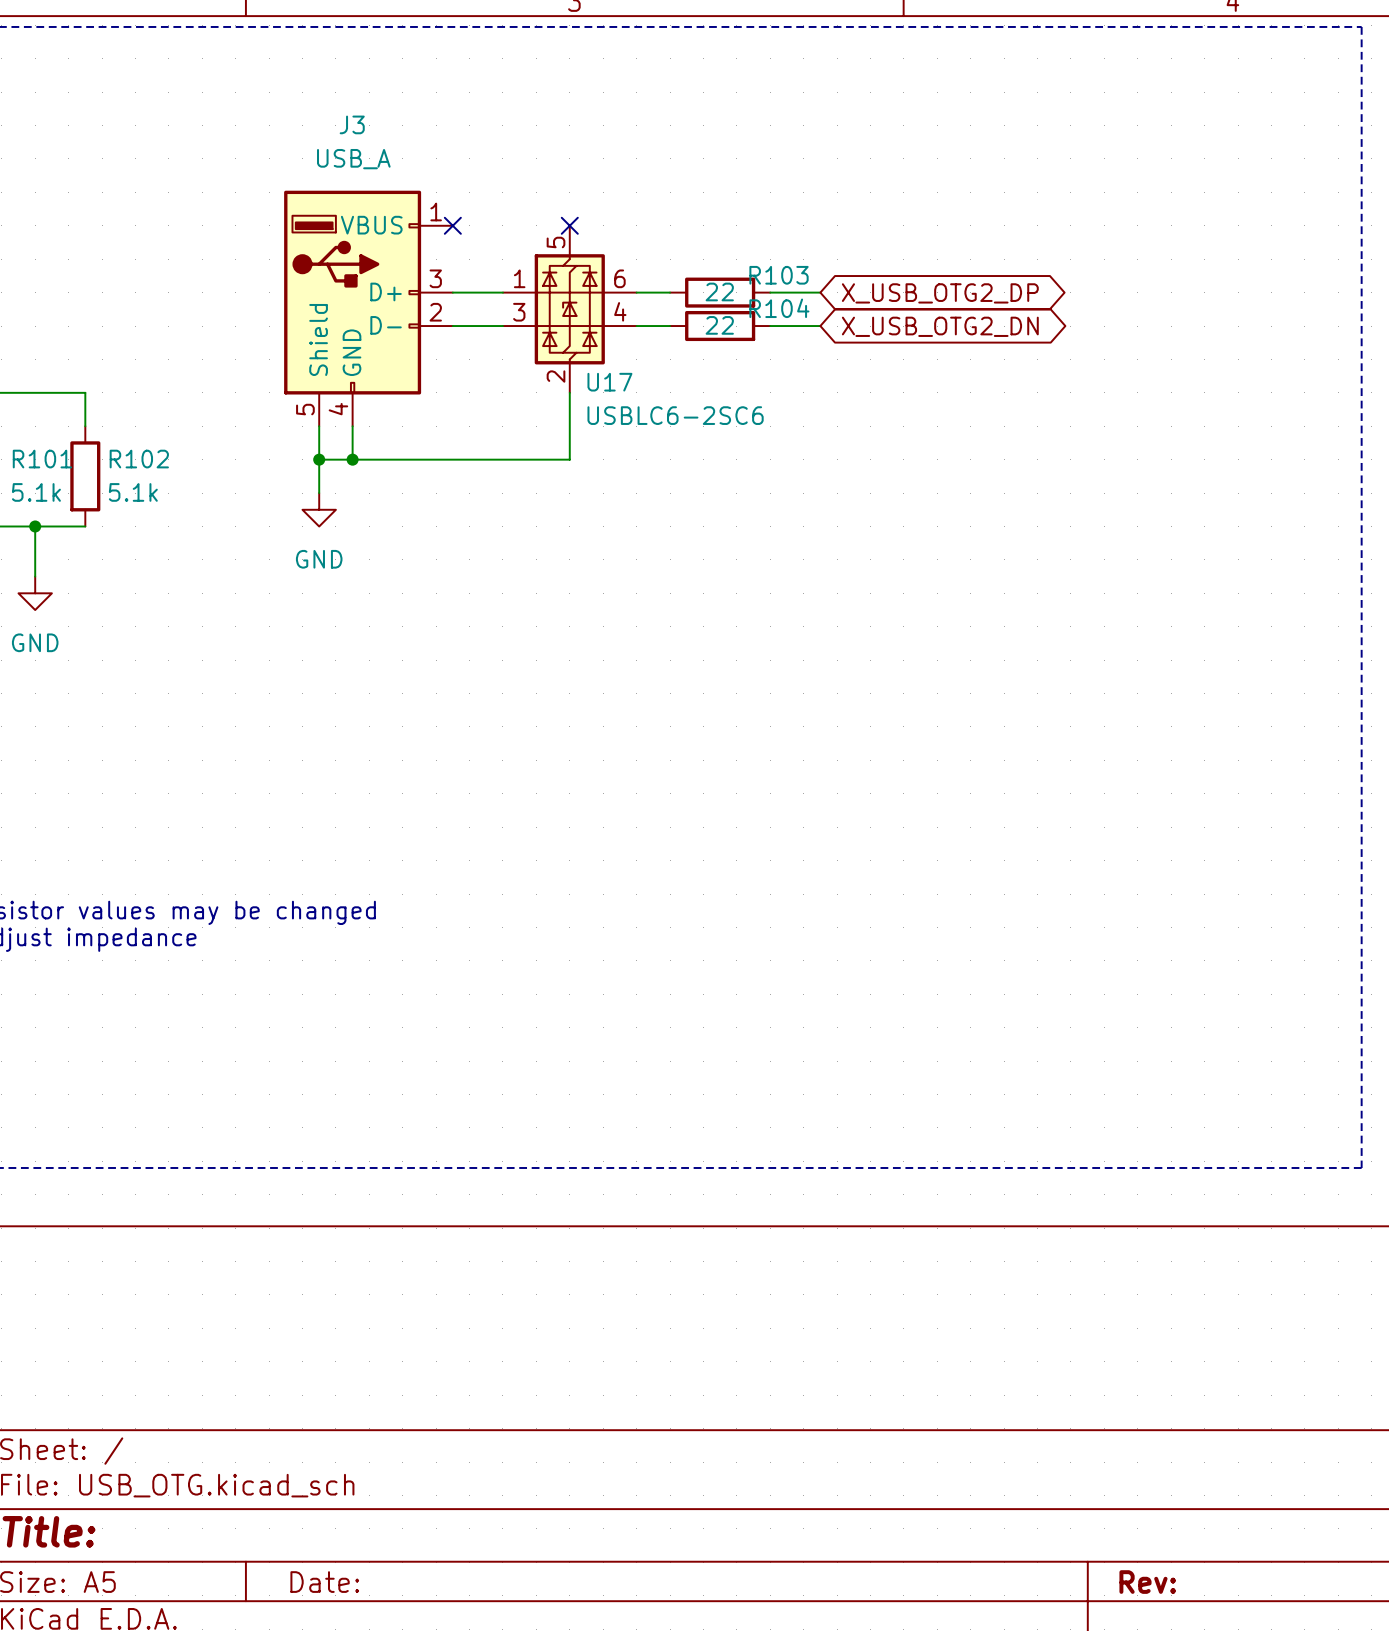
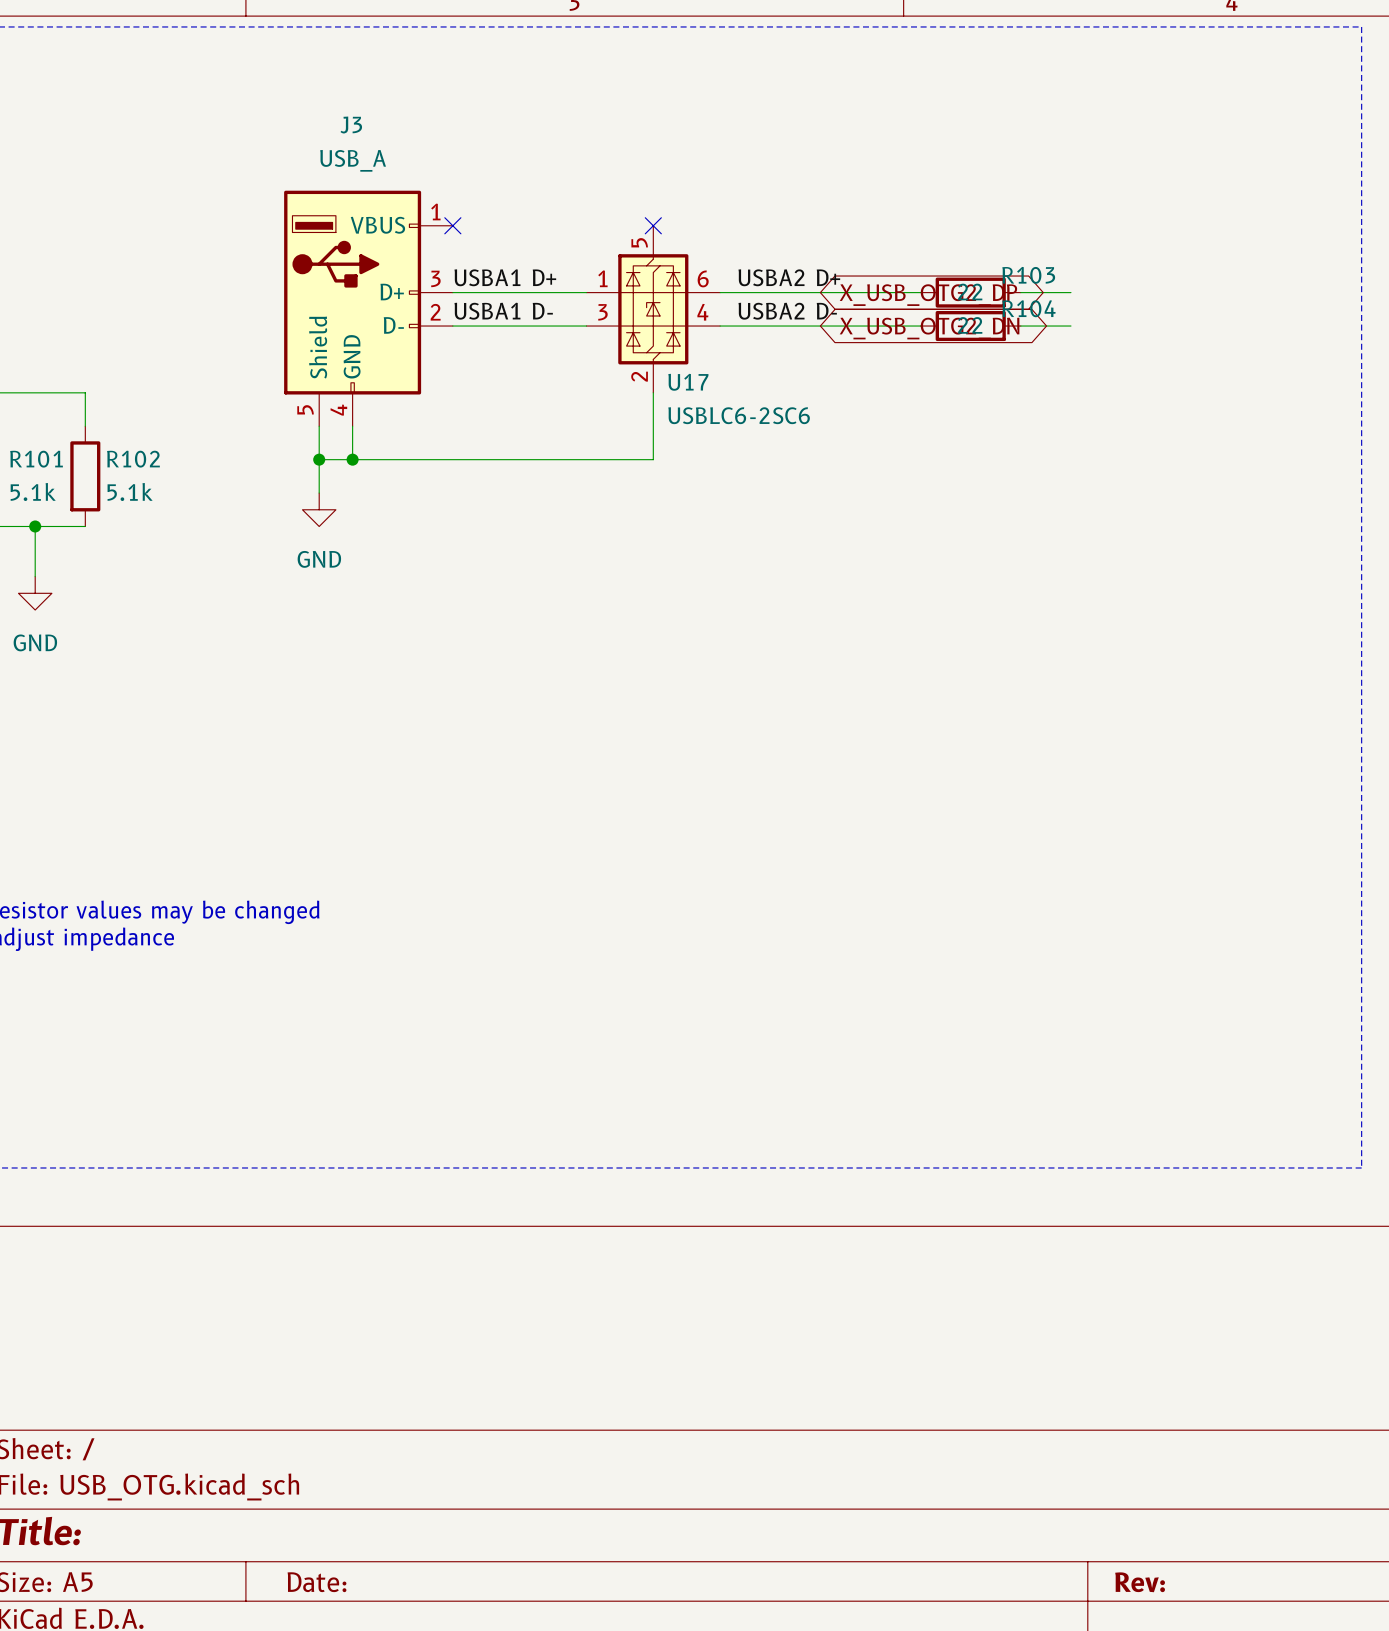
no-connect mark: (569, 225) -> none
no-connect mark: none -> (653, 225)
label: none -> USBA1 D+ (505, 277)
label: none -> USBA2 D+ (789, 277)
wire: none -> (720, 292) (770, 292)
R103 position: (720, 292) -> (970, 292)
wire: none -> (820, 292) (920, 292)
wire: none -> (1020, 292) (1070, 292)
U17 position: (569, 309) -> (653, 309)
label: none -> USBA1 D- (503, 311)
label: none -> USBA2 D- (787, 311)
wire: none -> (720, 326) (770, 326)
R104 position: (720, 326) -> (970, 326)
wire: none -> (820, 326) (920, 326)
wire: none -> (1020, 326) (1070, 326)
wire: (569, 392) (569, 459) -> (653, 392) (653, 459) (569, 459)

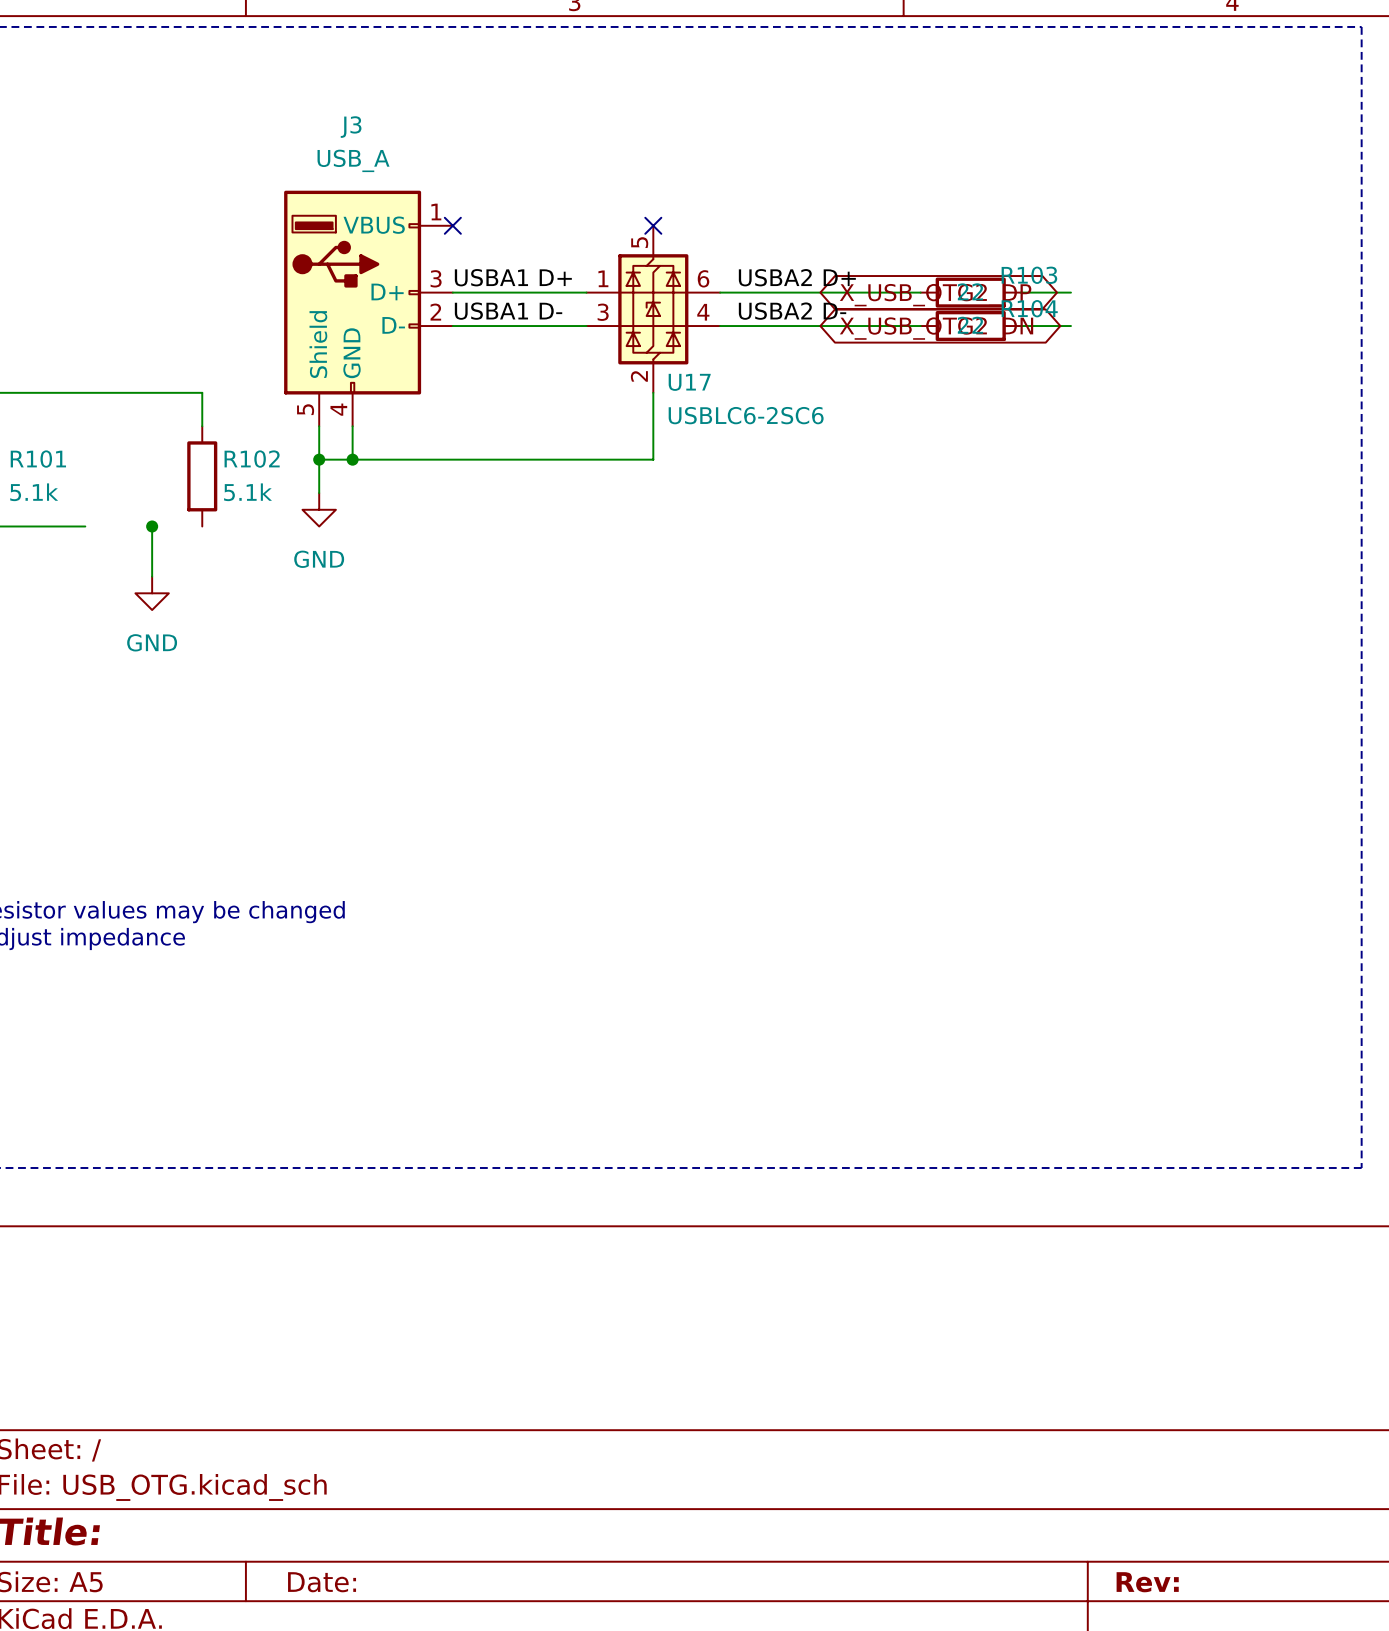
wire: (85, 392) (85, 426) -> (85, 392) (202, 392) (202, 426)
R102 position: (85, 476) -> (202, 476)
wire: (35, 526) (35, 576) -> (152, 526) (152, 576)
junction: (35, 526) -> none
junction: none -> (152, 526)
power symbol position: GND (35, 593) -> GND (152, 593)

